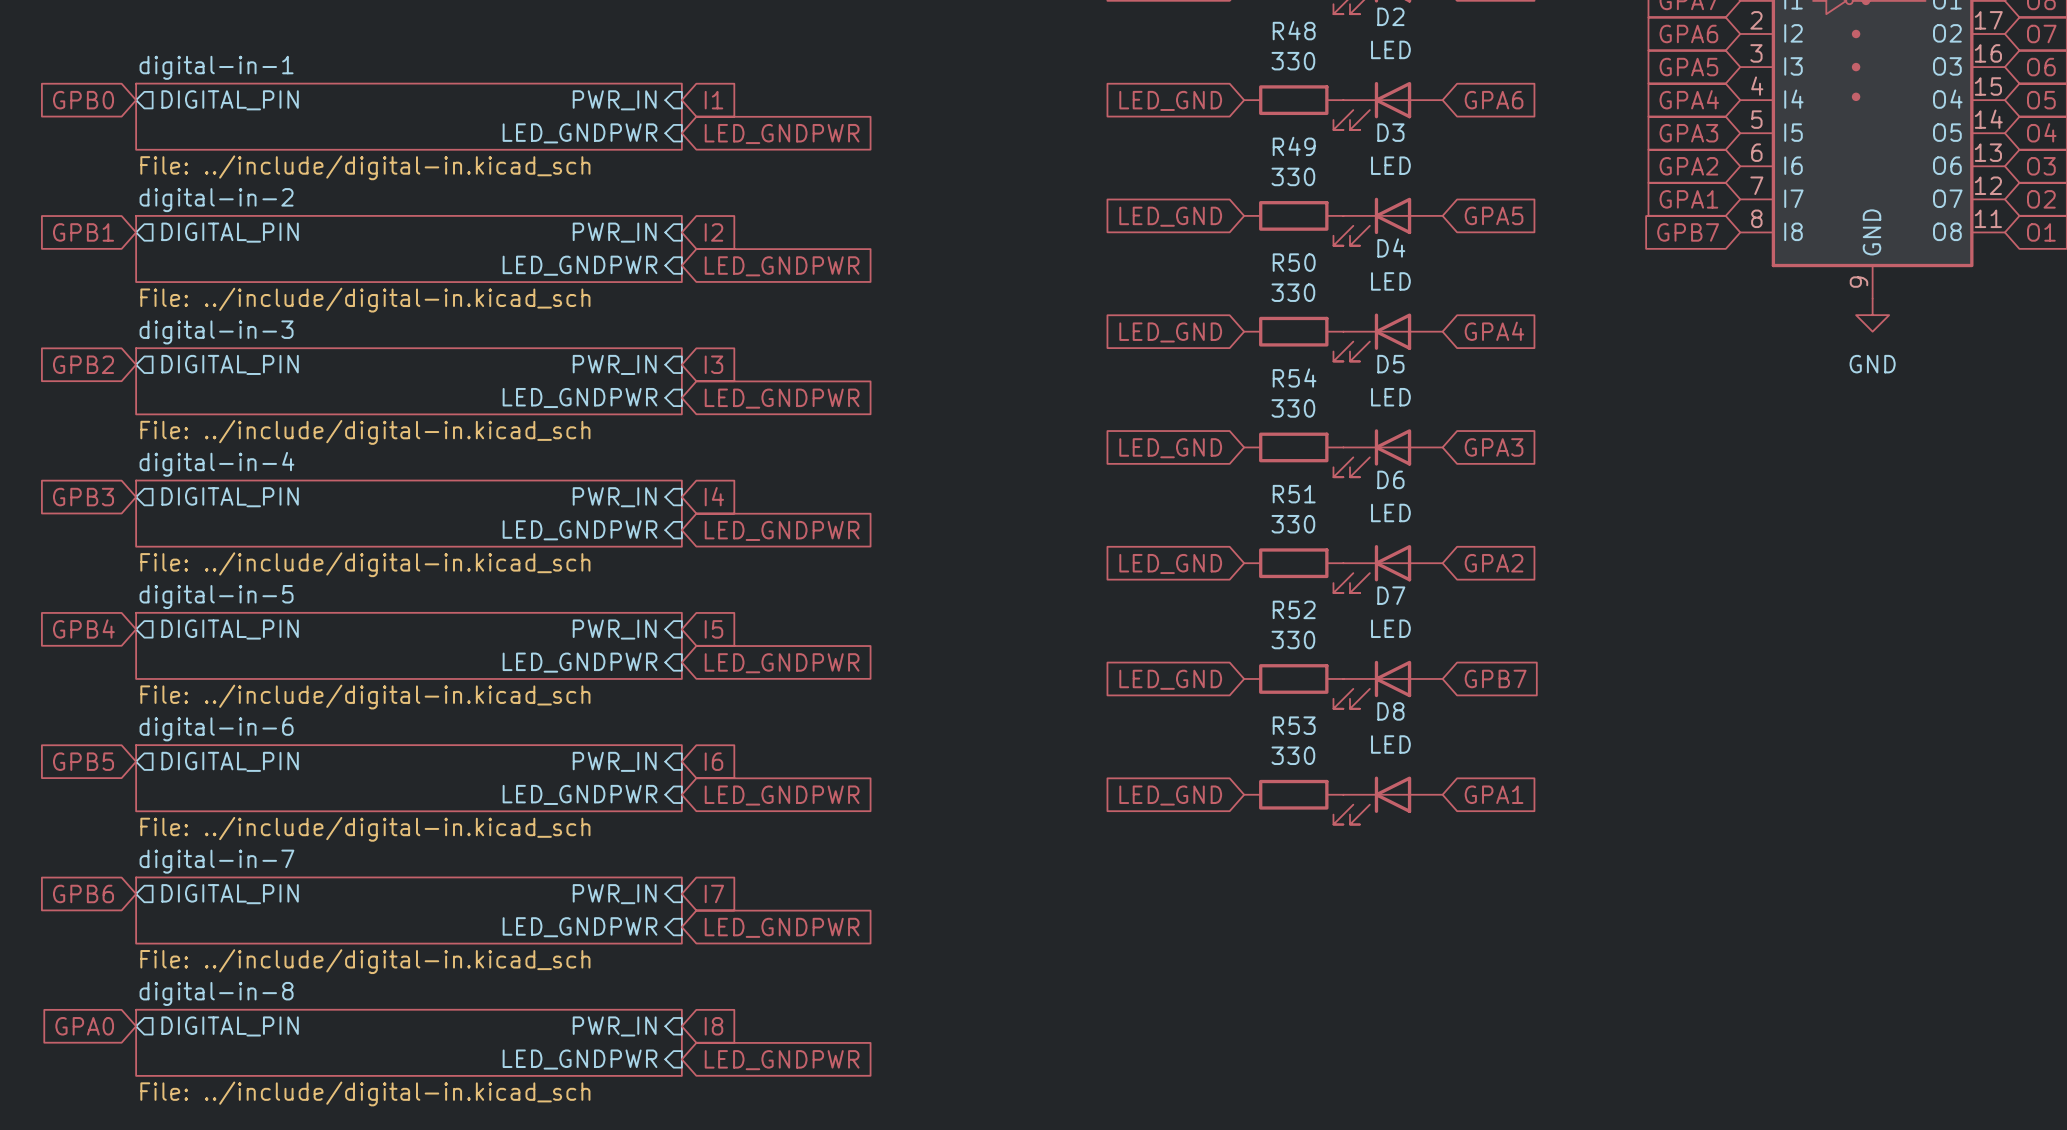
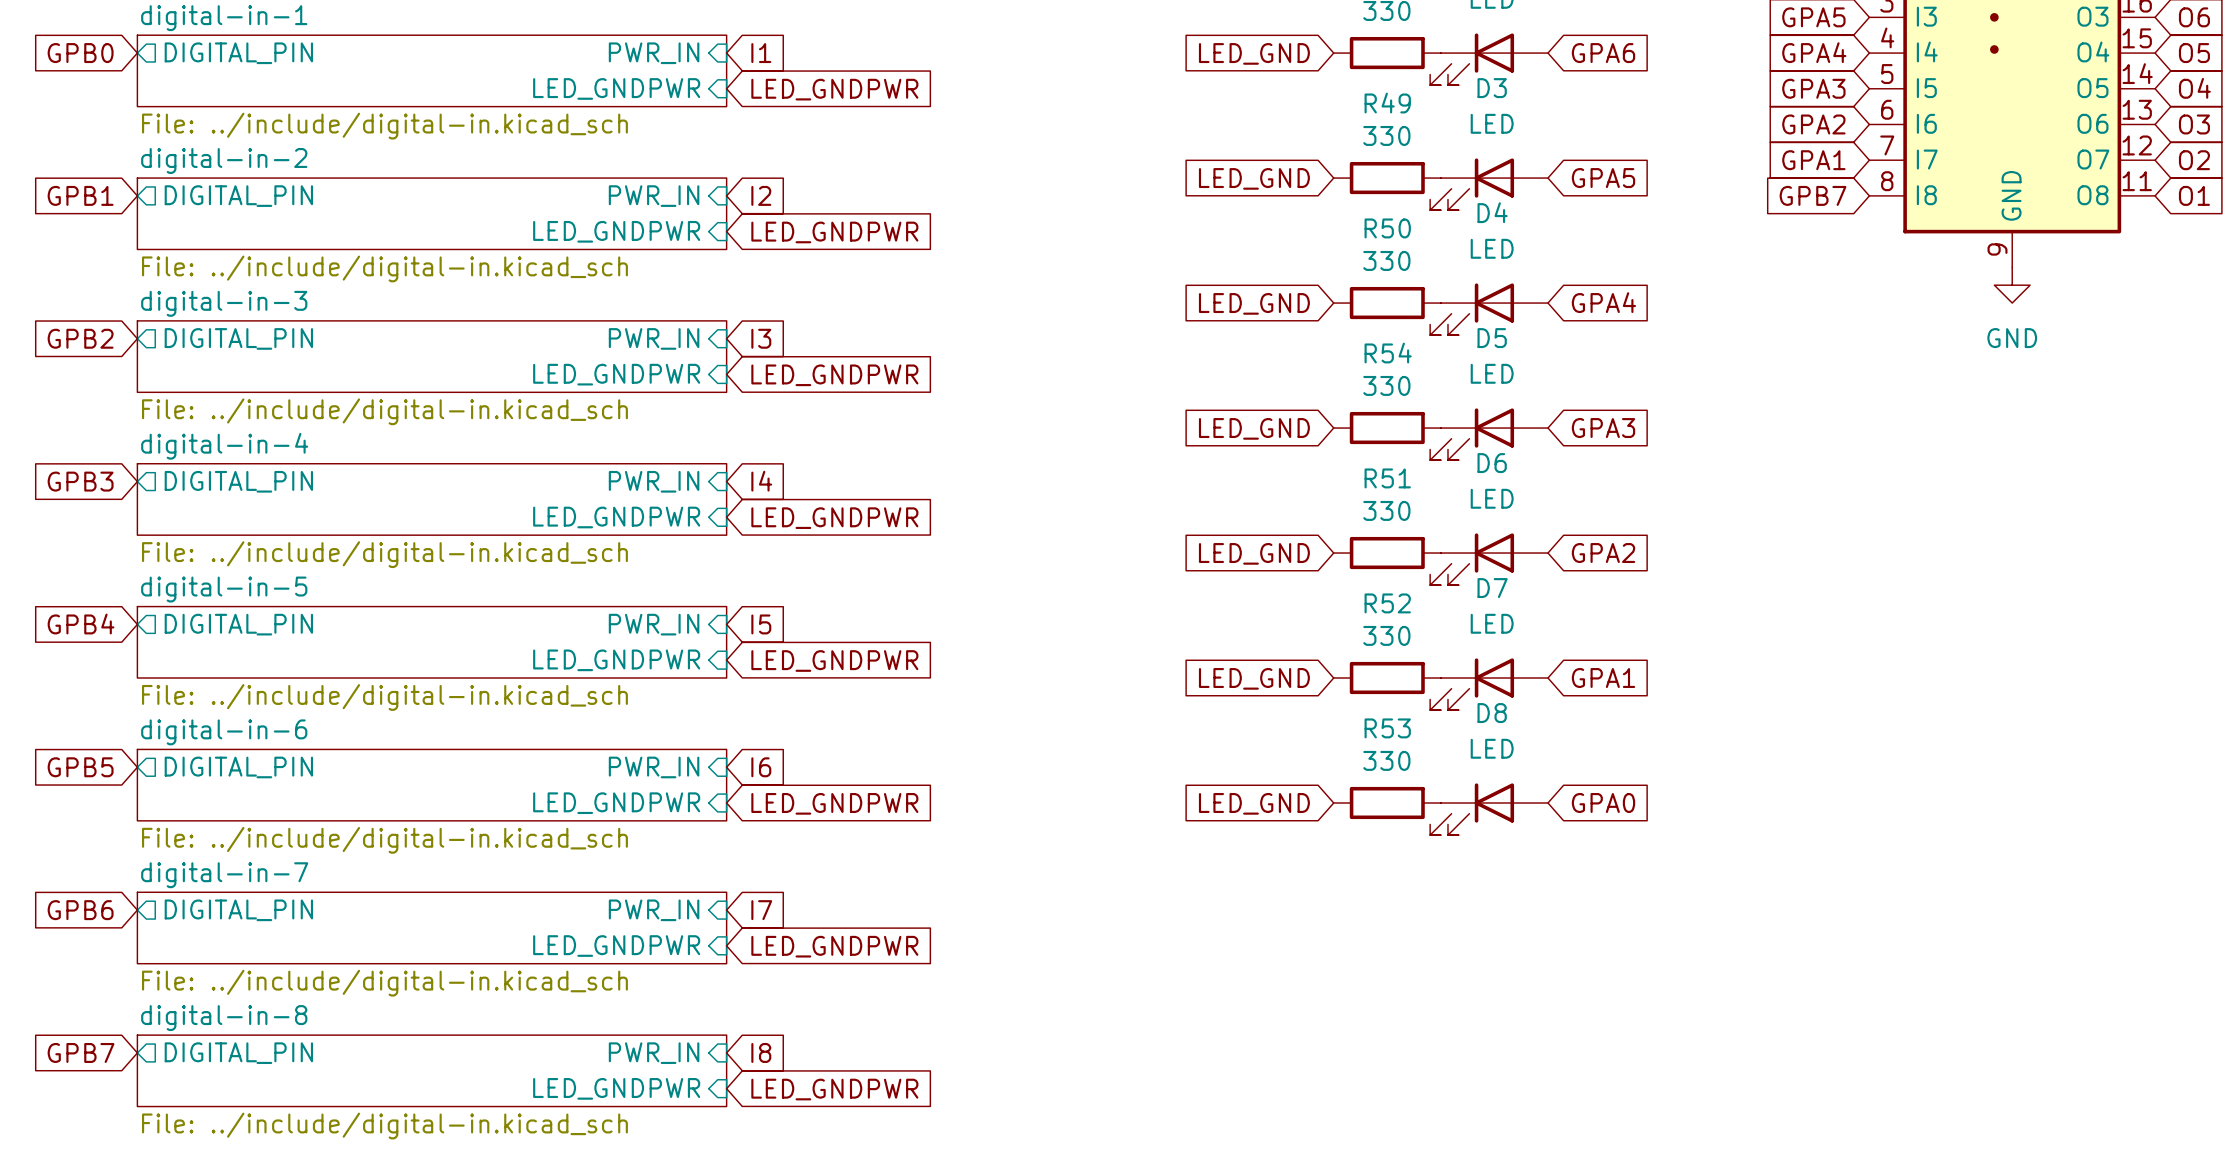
global label: GPB7 (1495, 678) -> GPA1 (1603, 678)
global label: GPA1 (1494, 794) -> GPA0 (1603, 802)
global label: GPA0 (84, 1026) -> GPB7 (81, 1052)

